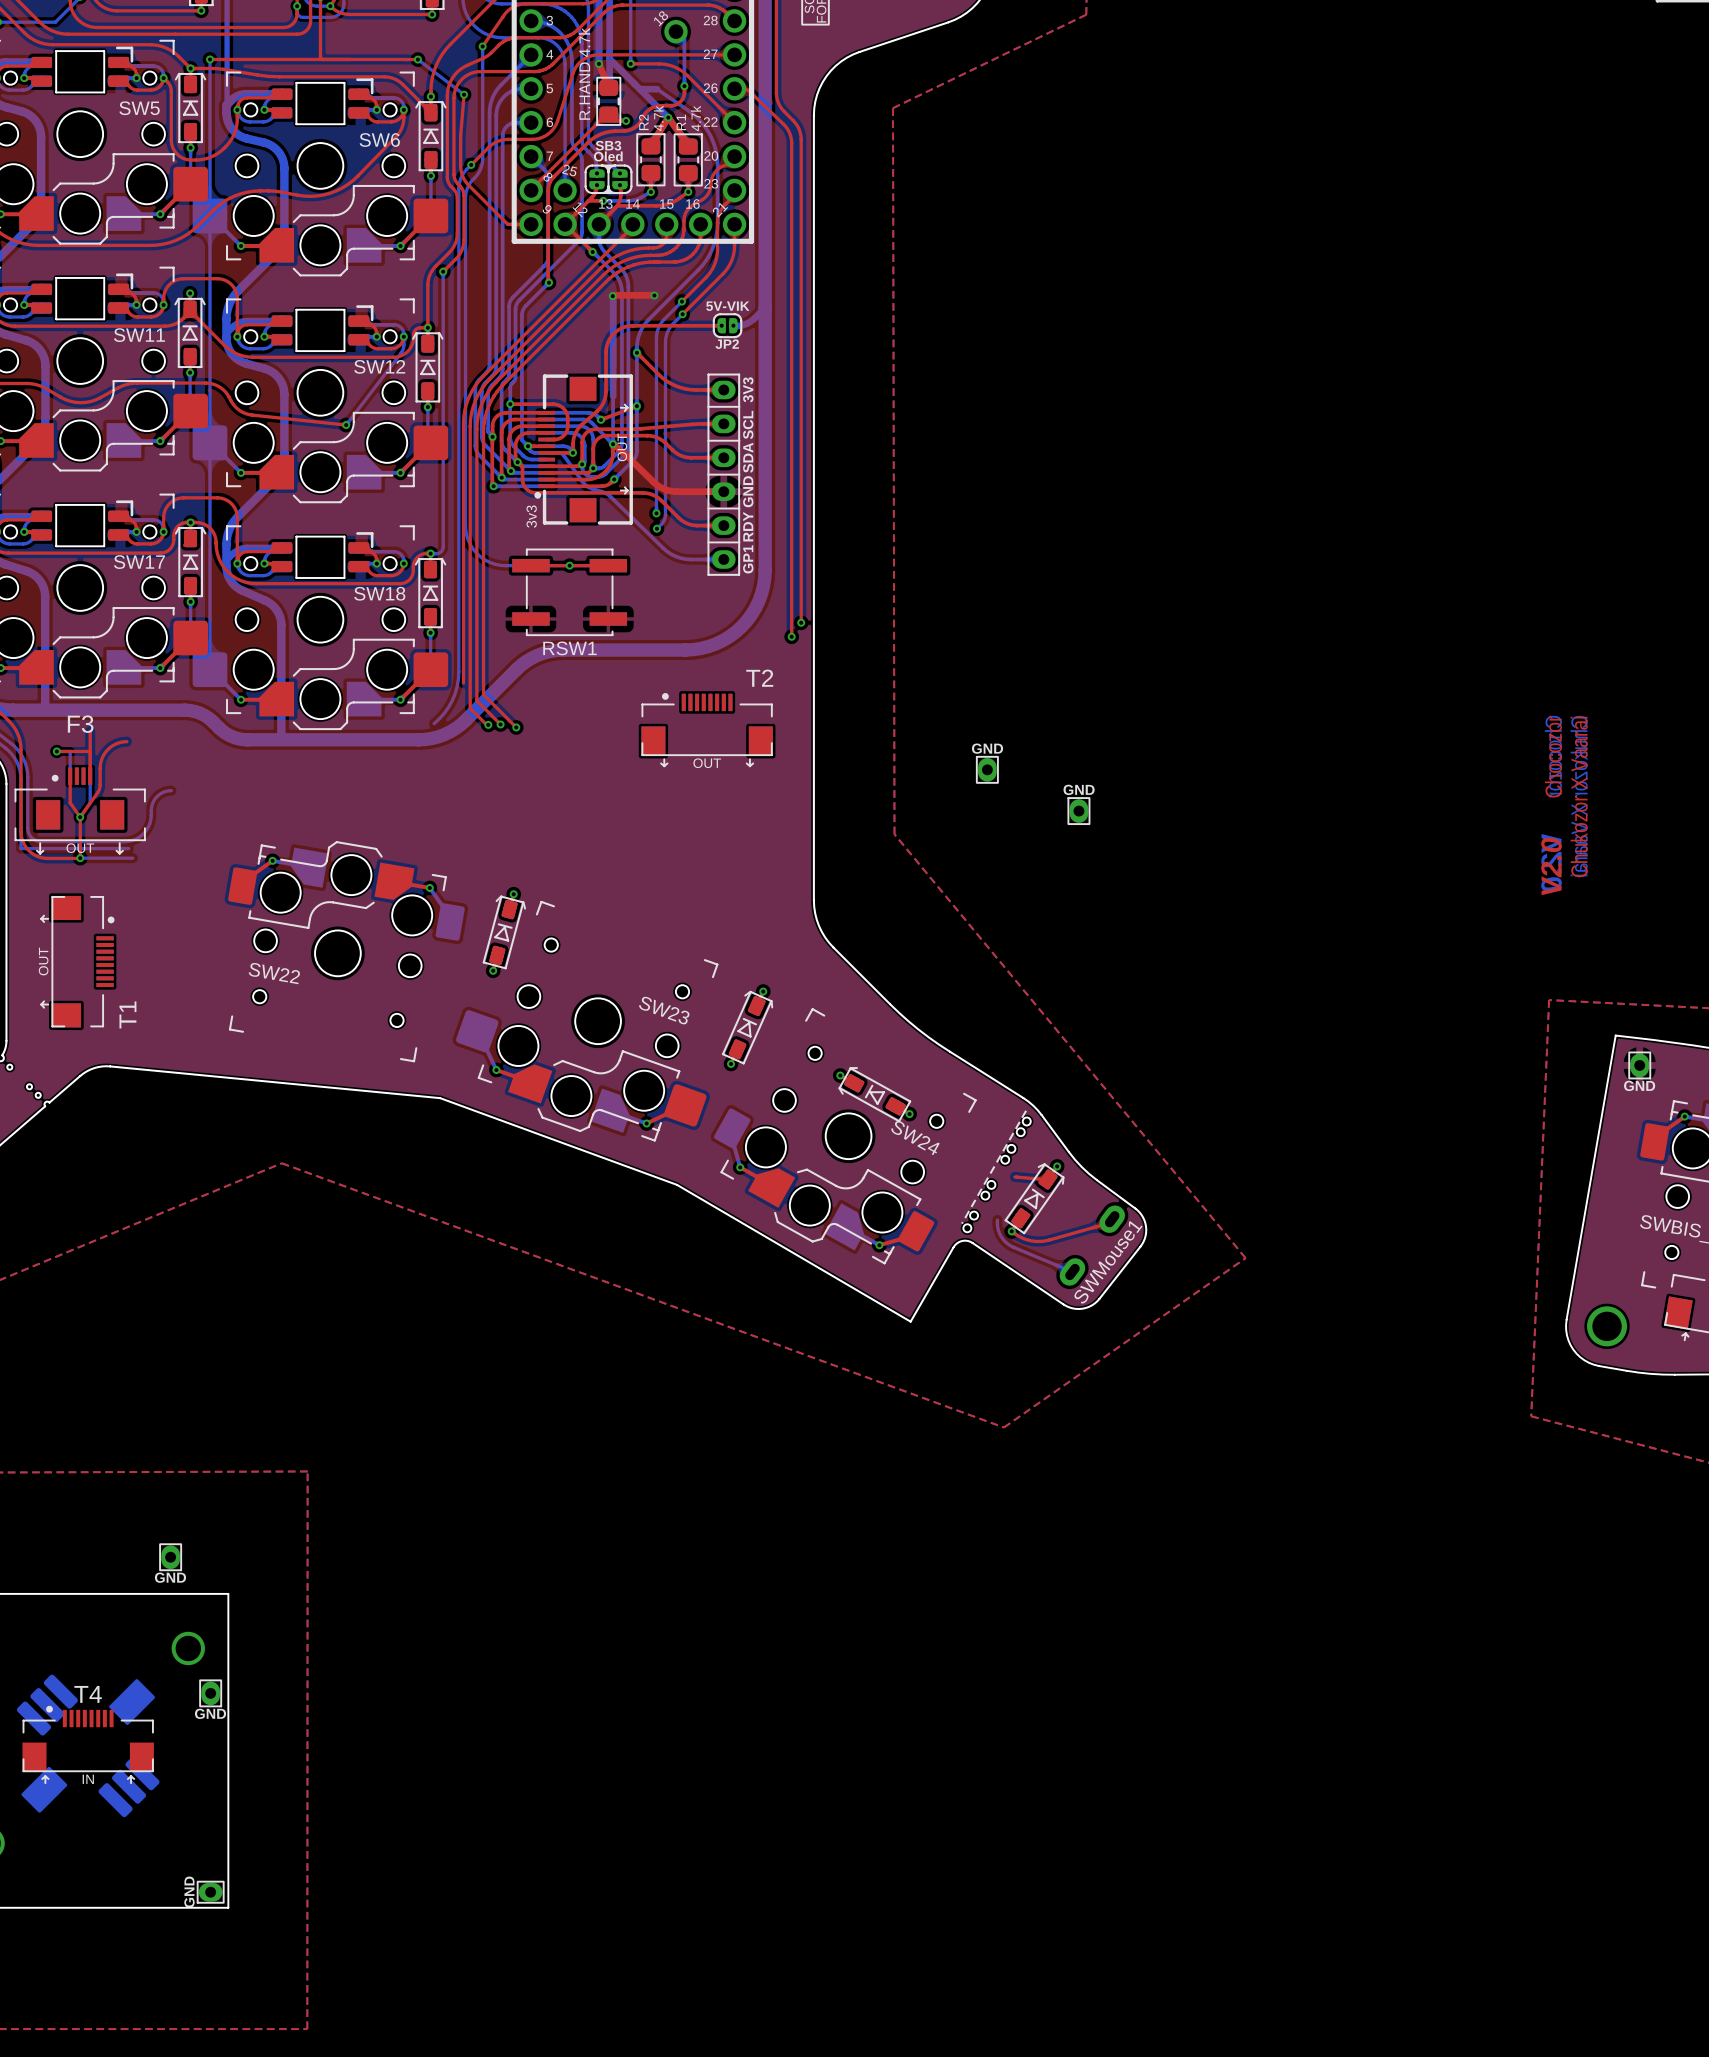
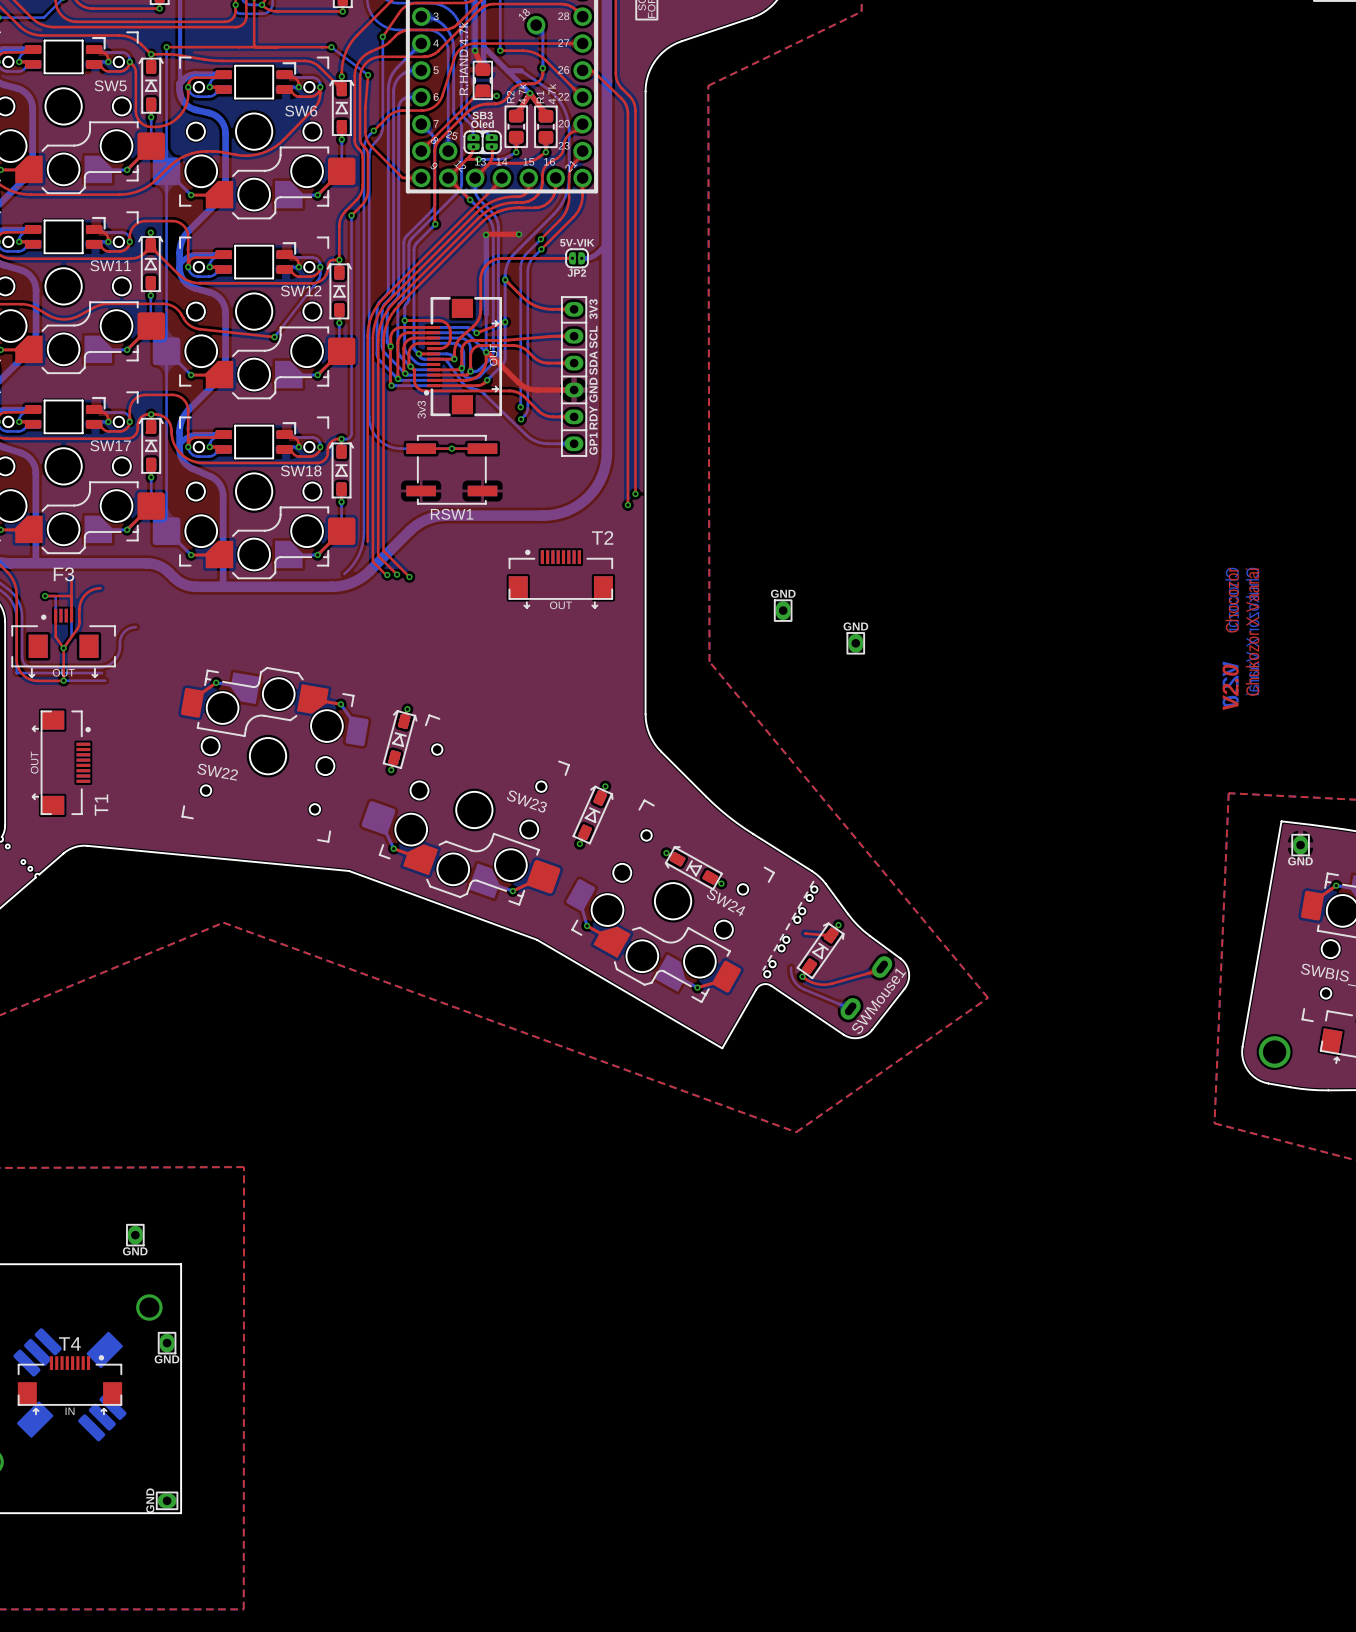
T4 footprint: [22, 1705, 154, 1784] -> [17, 1355, 123, 1415]

